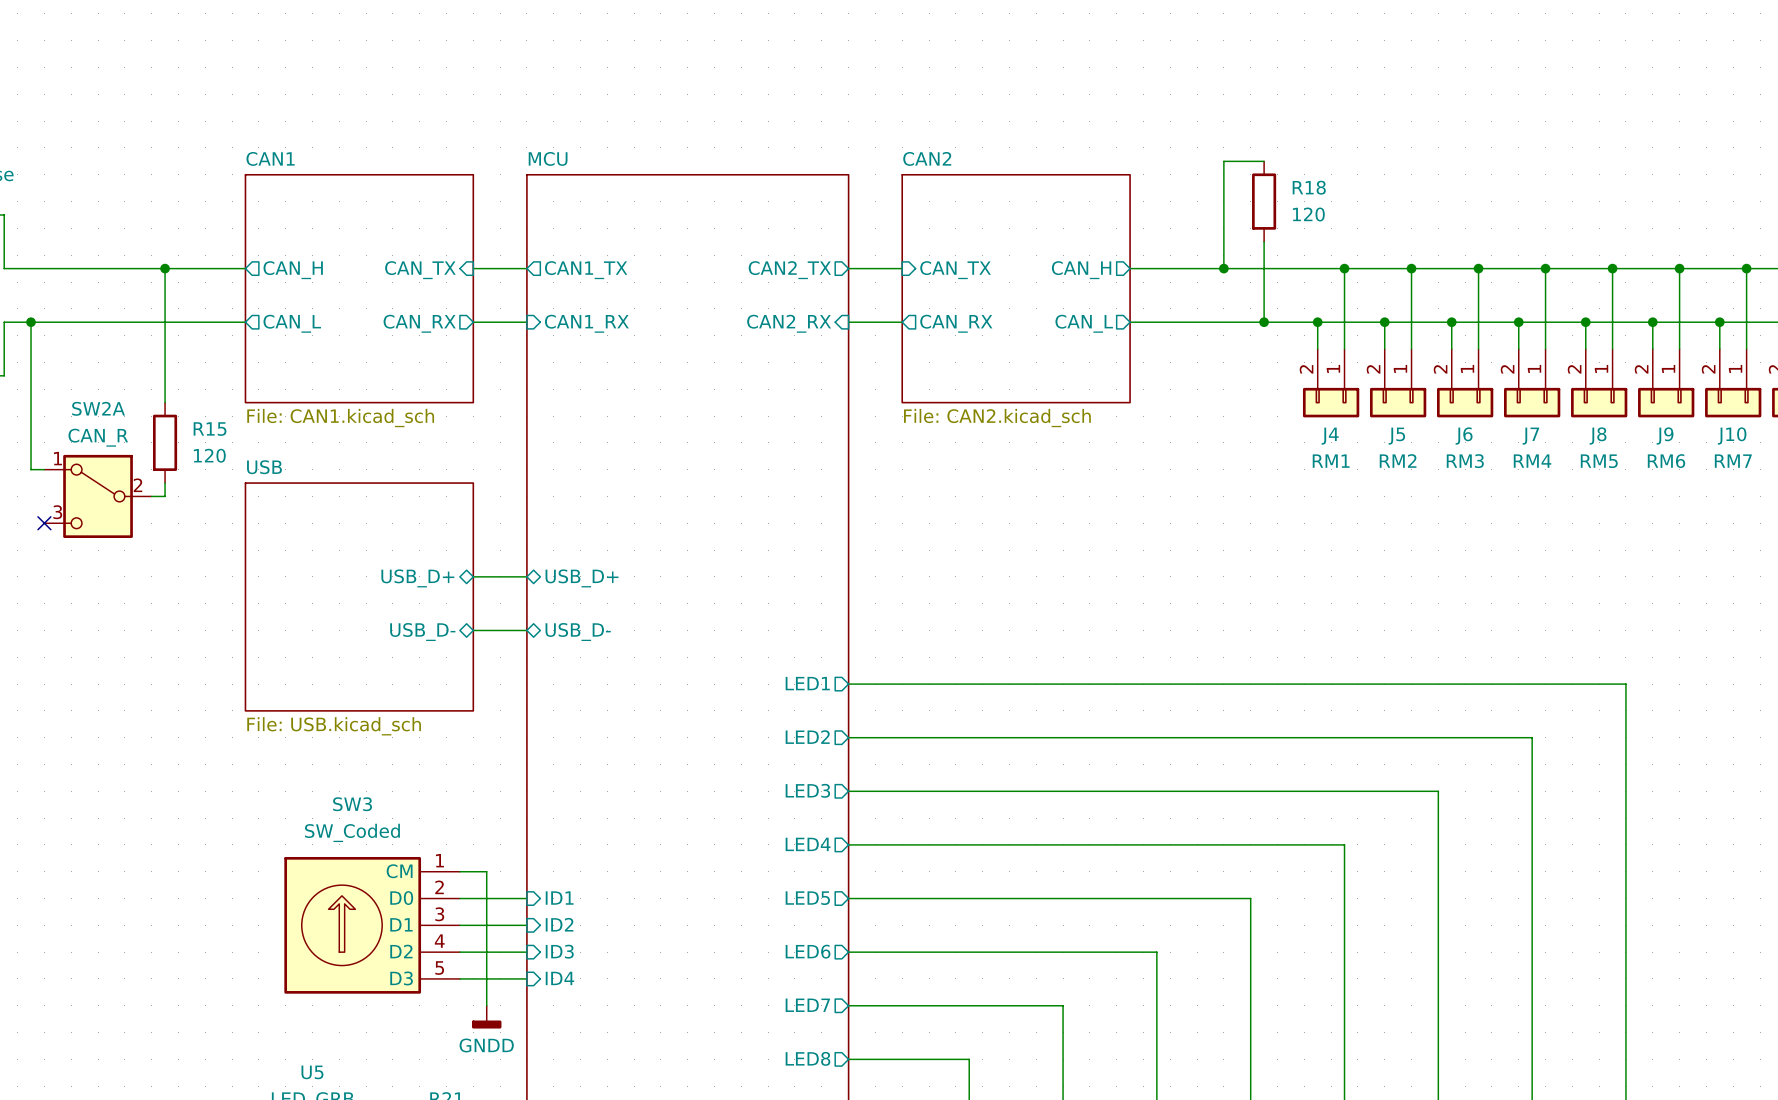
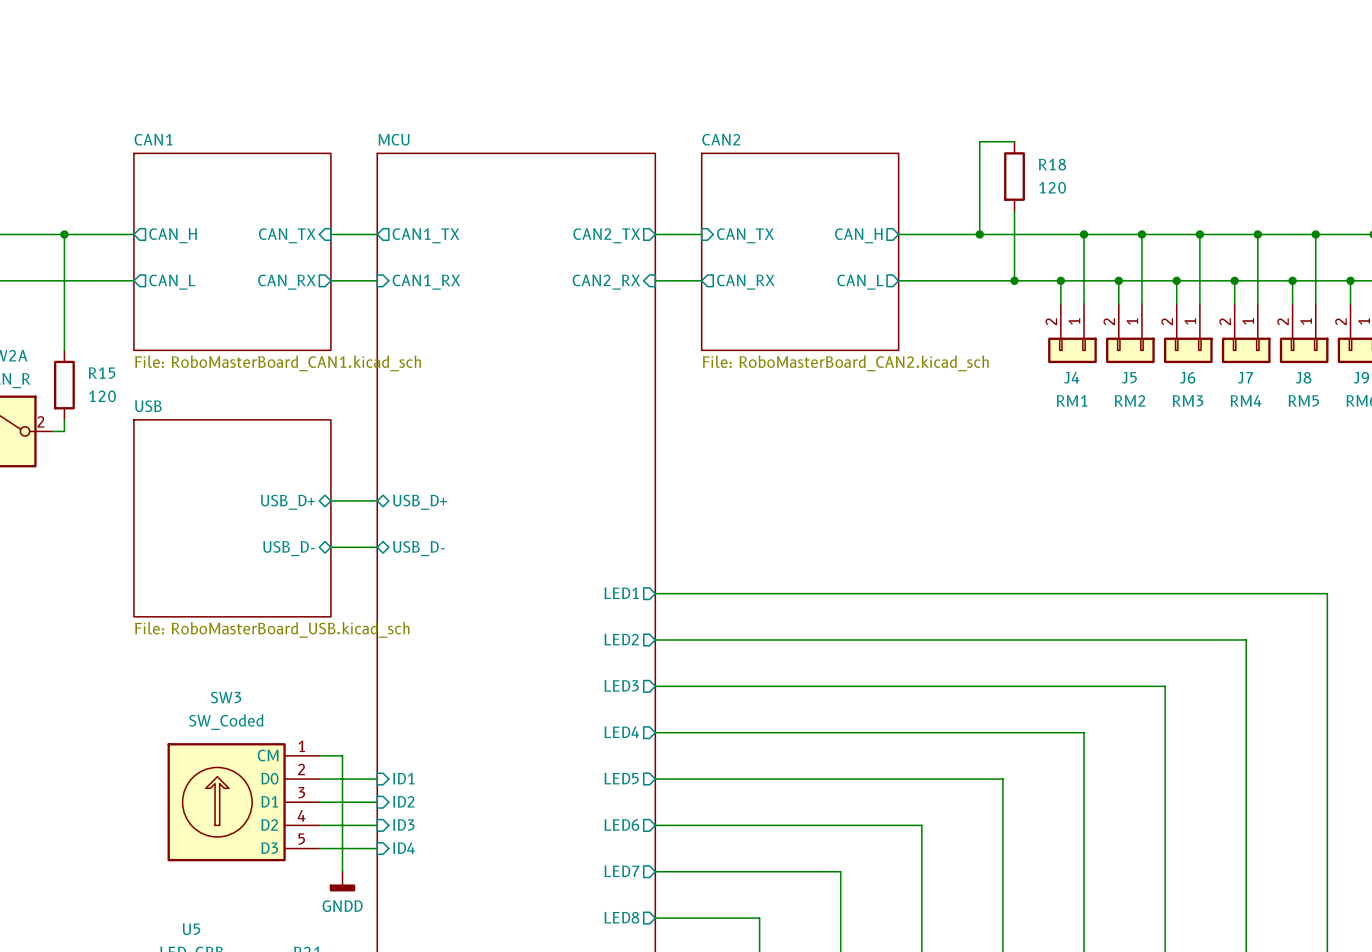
sheet CAN1 value: File: CAN1.kicad_sch (340, 418) -> File: RoboMasterBoard_CAN1.kicad_sch (278, 363)
sheet CAN2 value: File: CAN2.kicad_sch (997, 418) -> File: RoboMasterBoard_CAN2.kicad_sch (845, 363)
sheet USB value: File: USB.kicad_sch (334, 726) -> File: RoboMasterBoard_USB.kicad_sch (272, 629)

